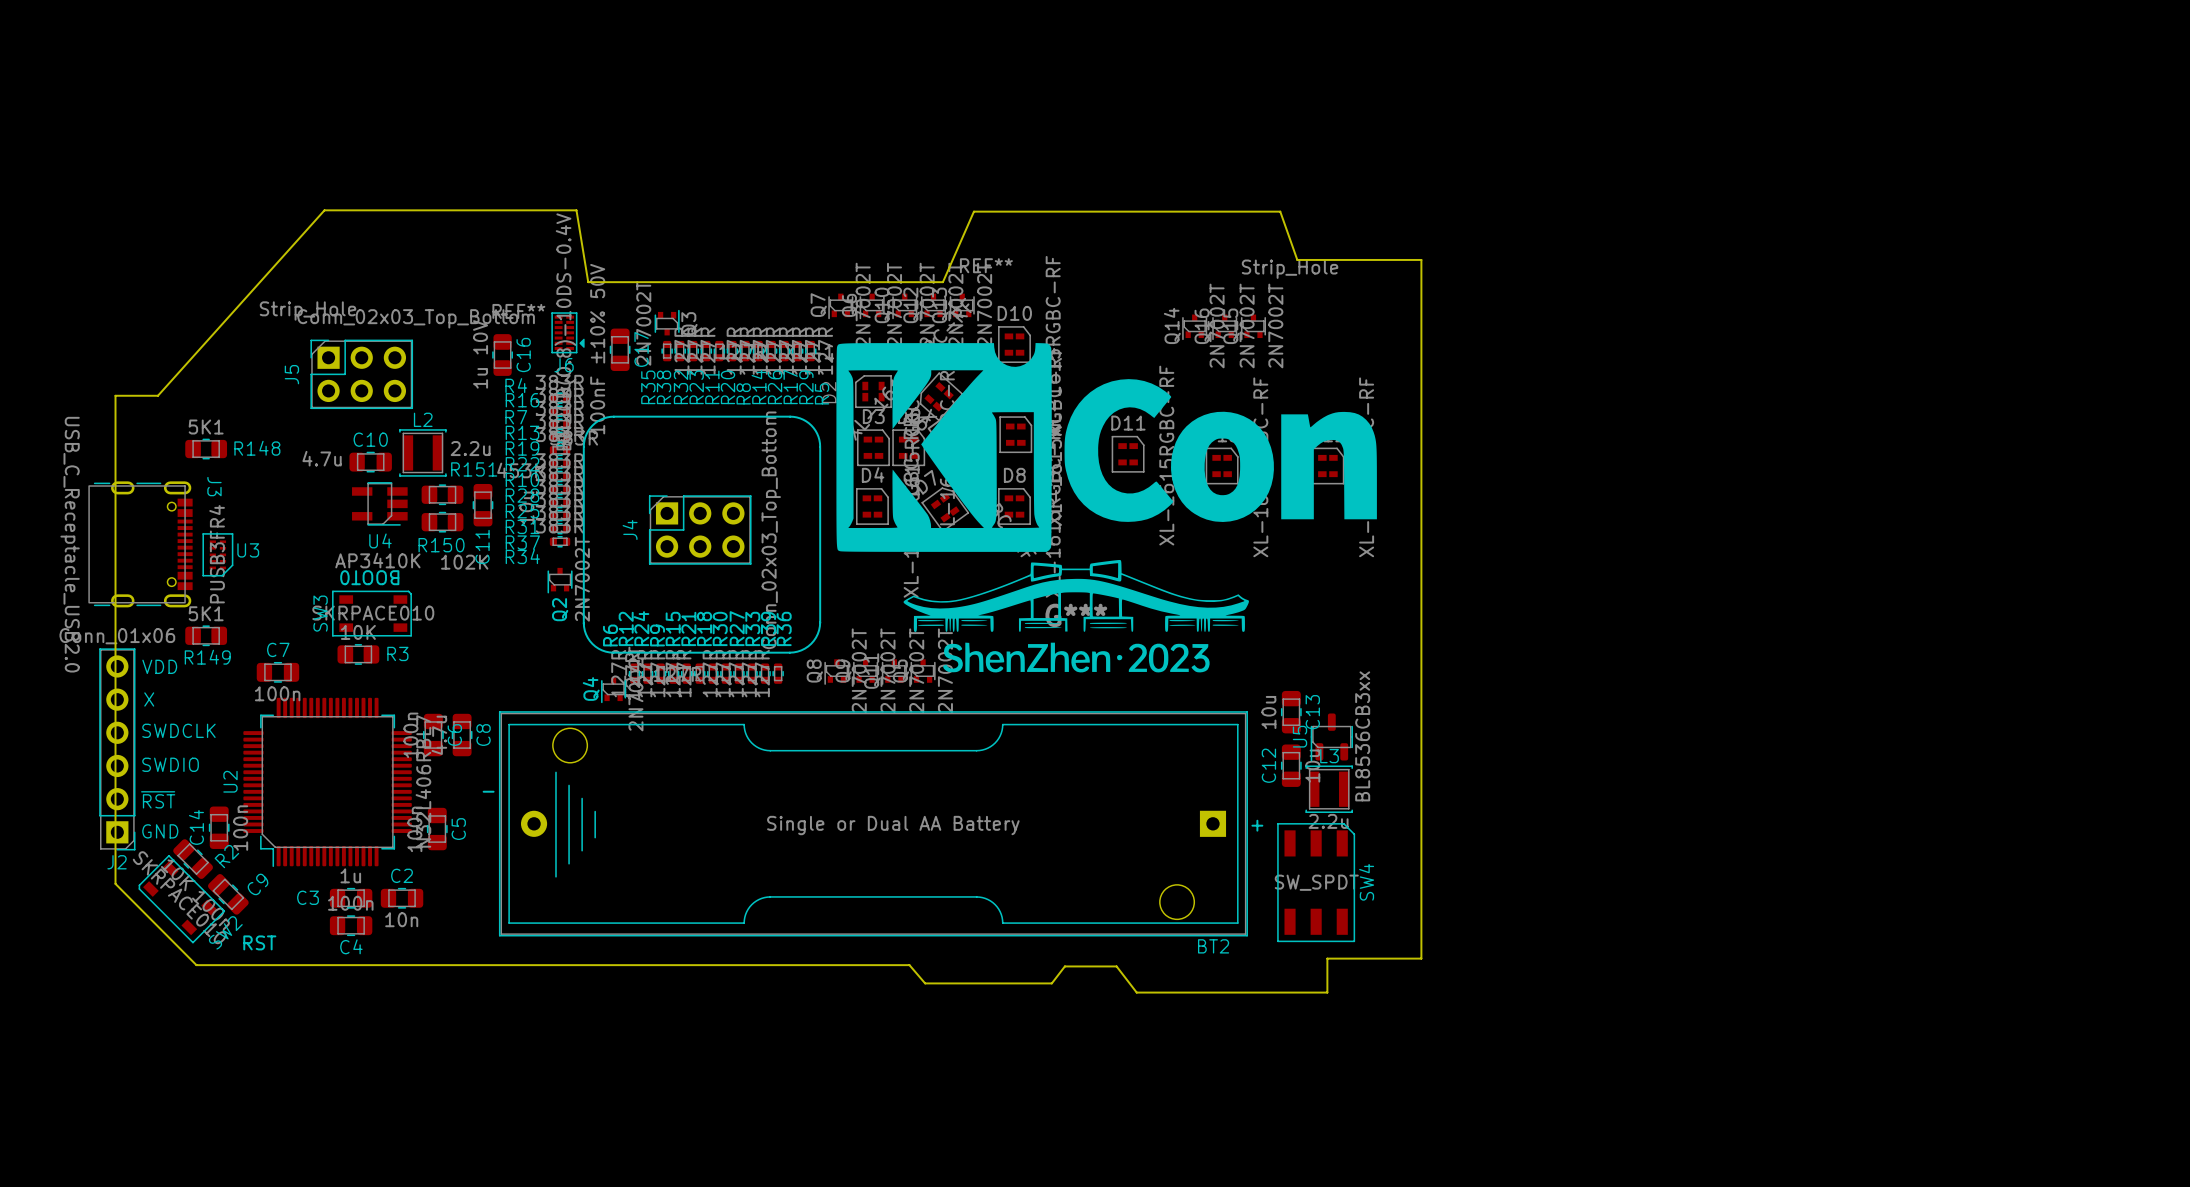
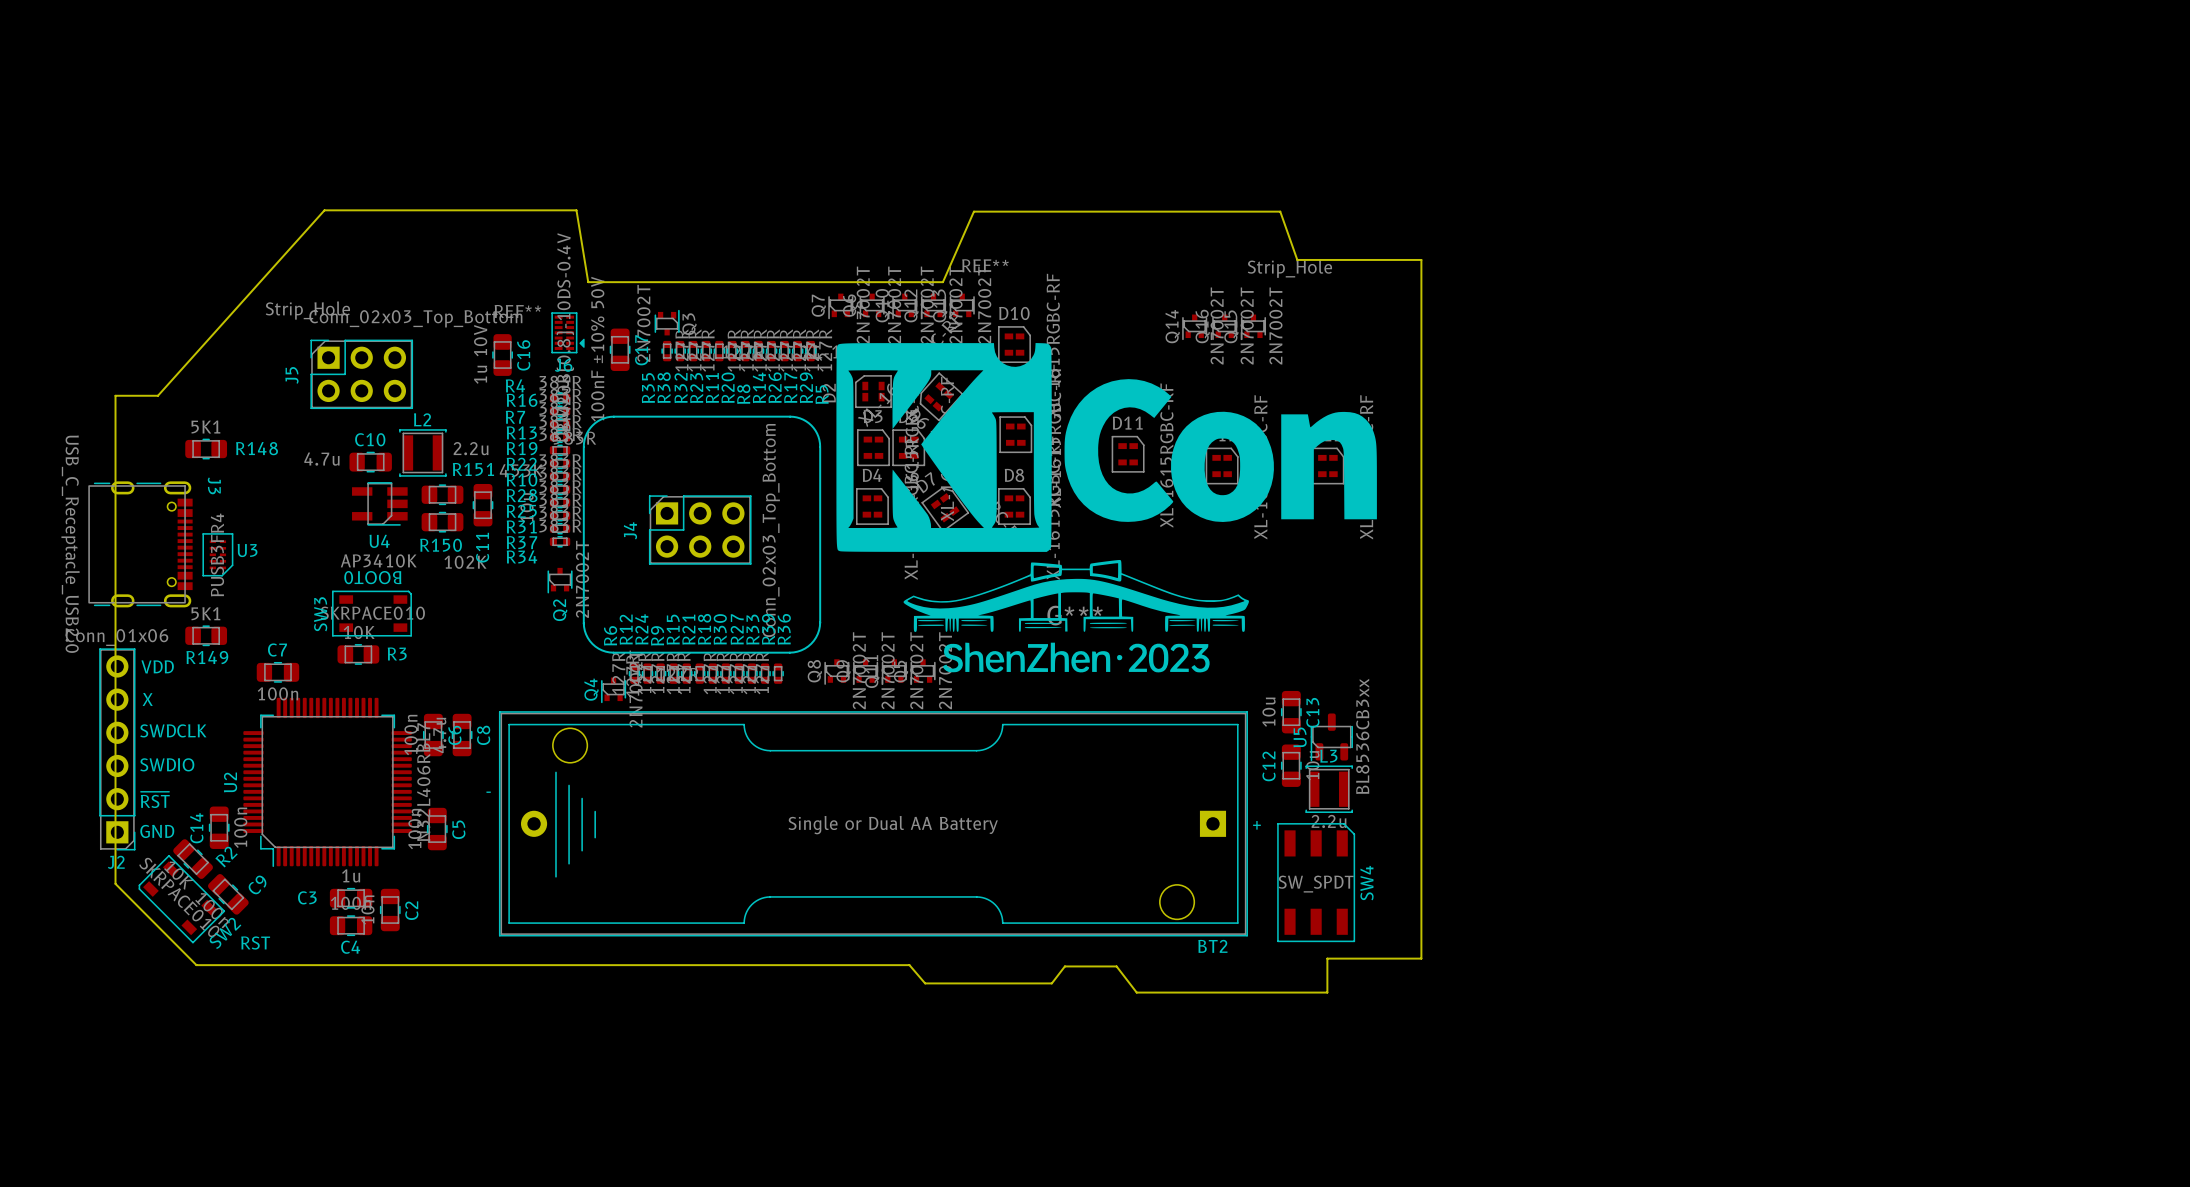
C2 rotation: 0° (402, 898) -> 90° clockwise (390, 910)

